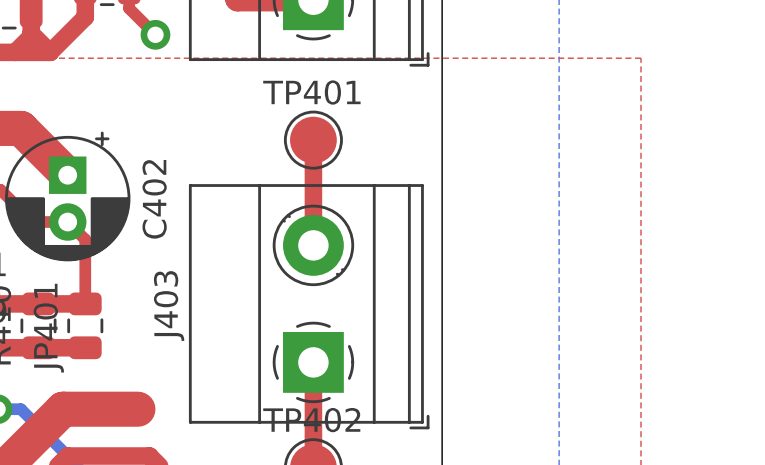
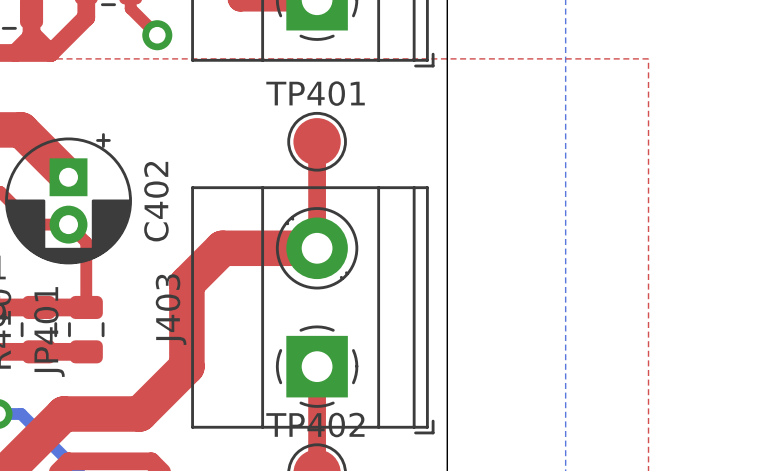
top track: none -> (317, 248) (222, 248) (186, 283) (186, 366) (139, 413)

